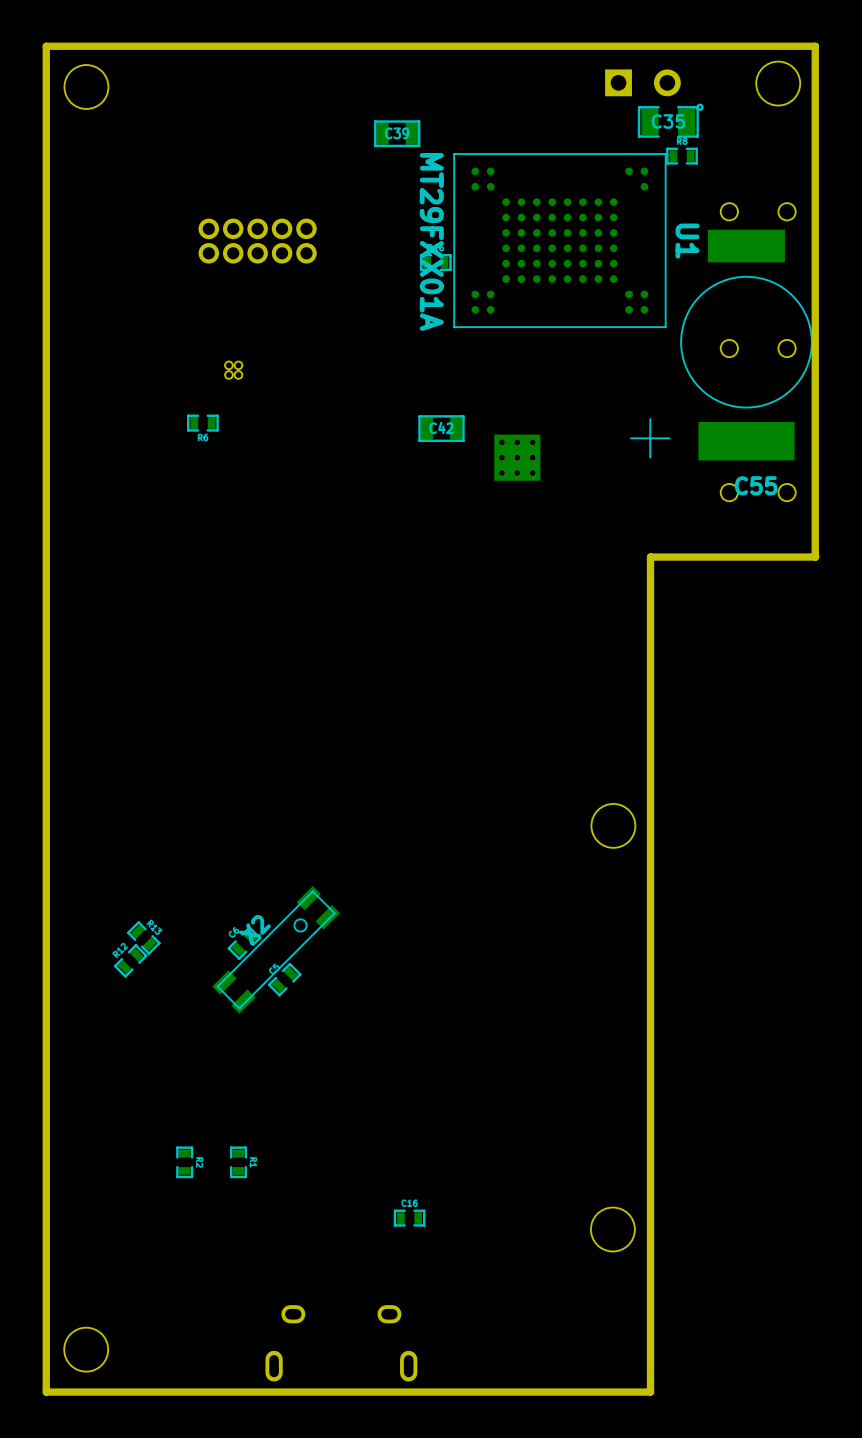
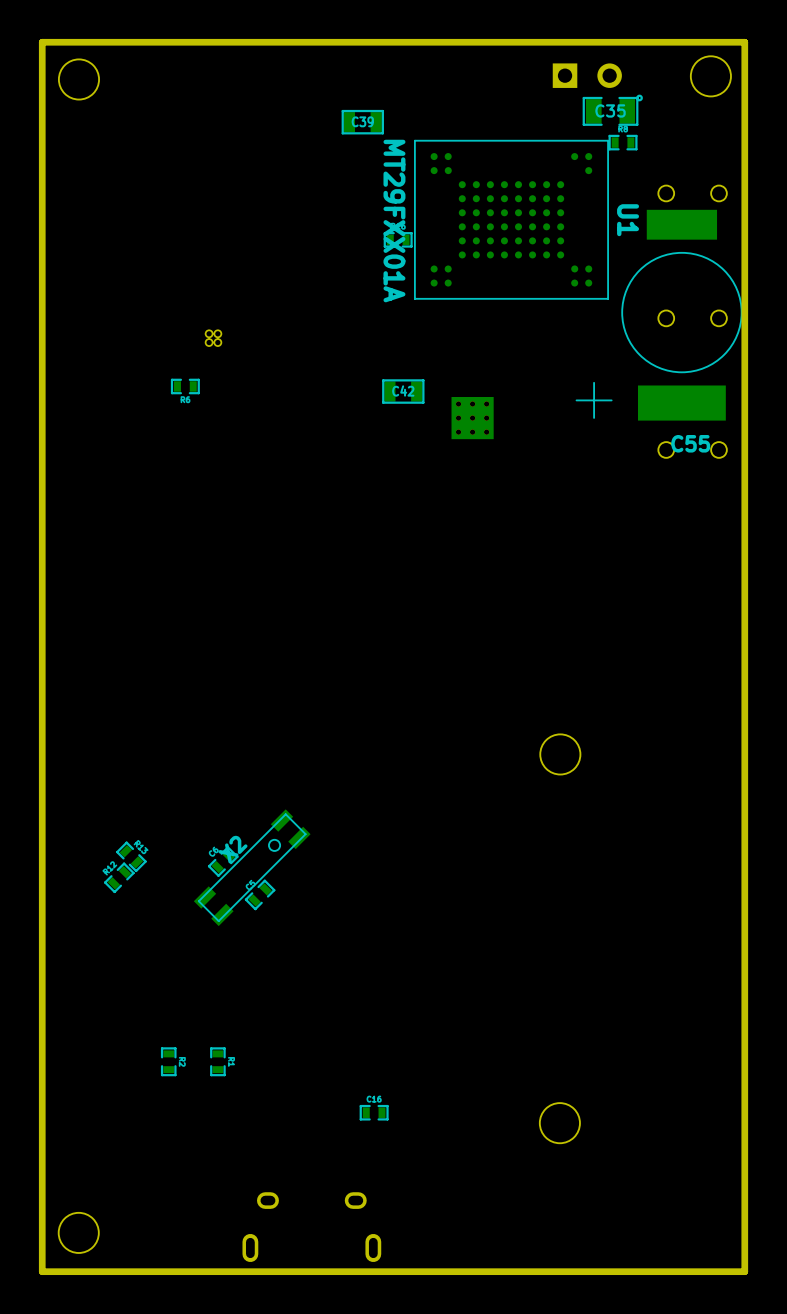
part: (257, 241) -> none
board edge: (815, 554) (815, 557) (650, 557) (650, 1391) -> (744, 507) (744, 1271) (594, 1271)

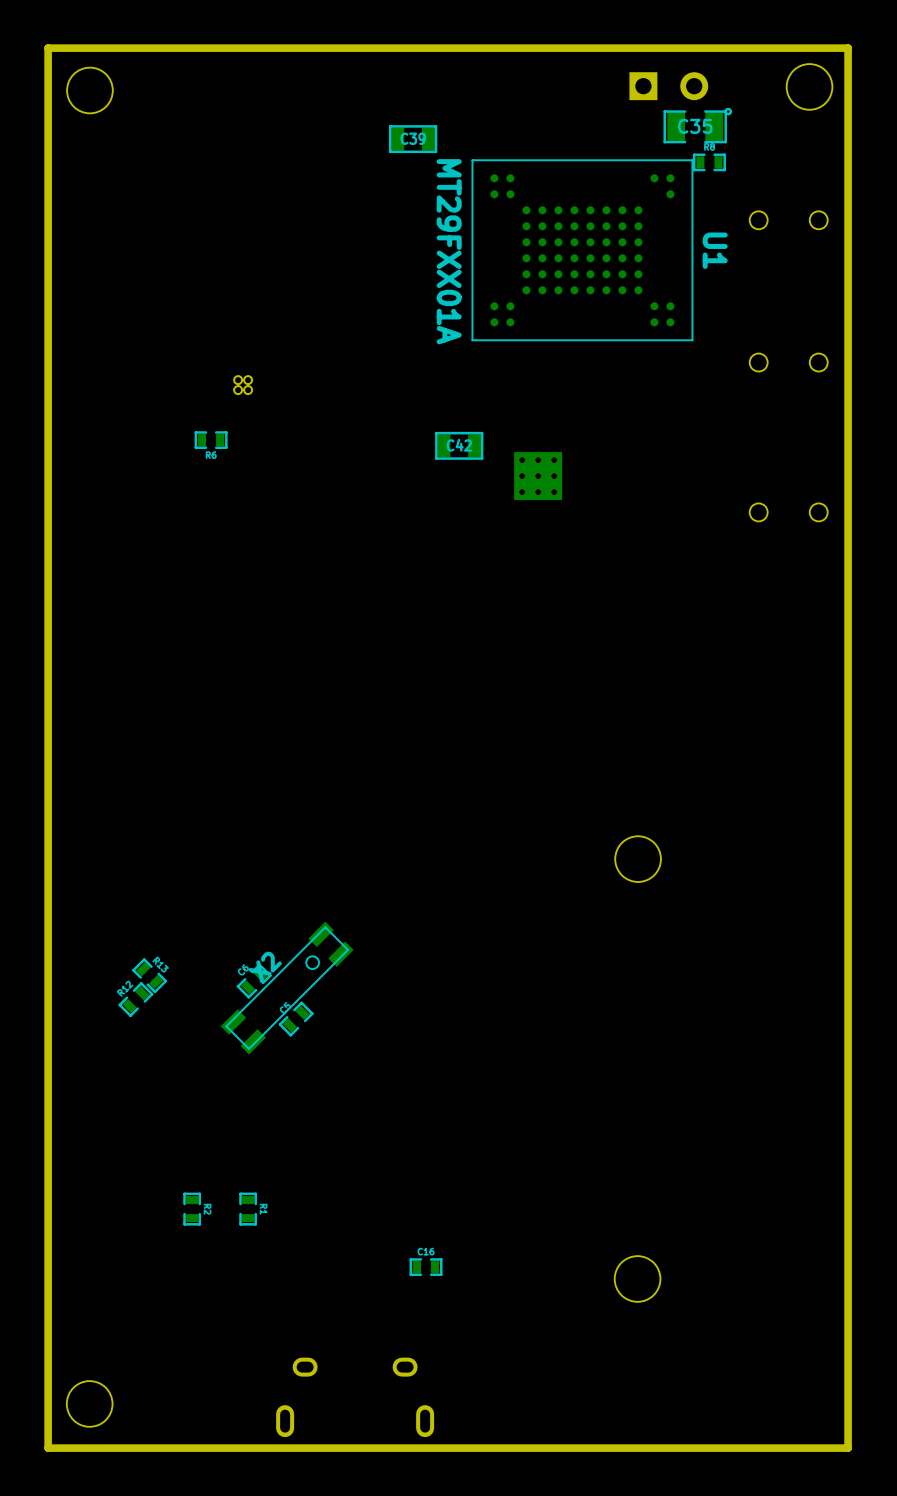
part: (398, 239) -> none
C55: (659, 315) -> none

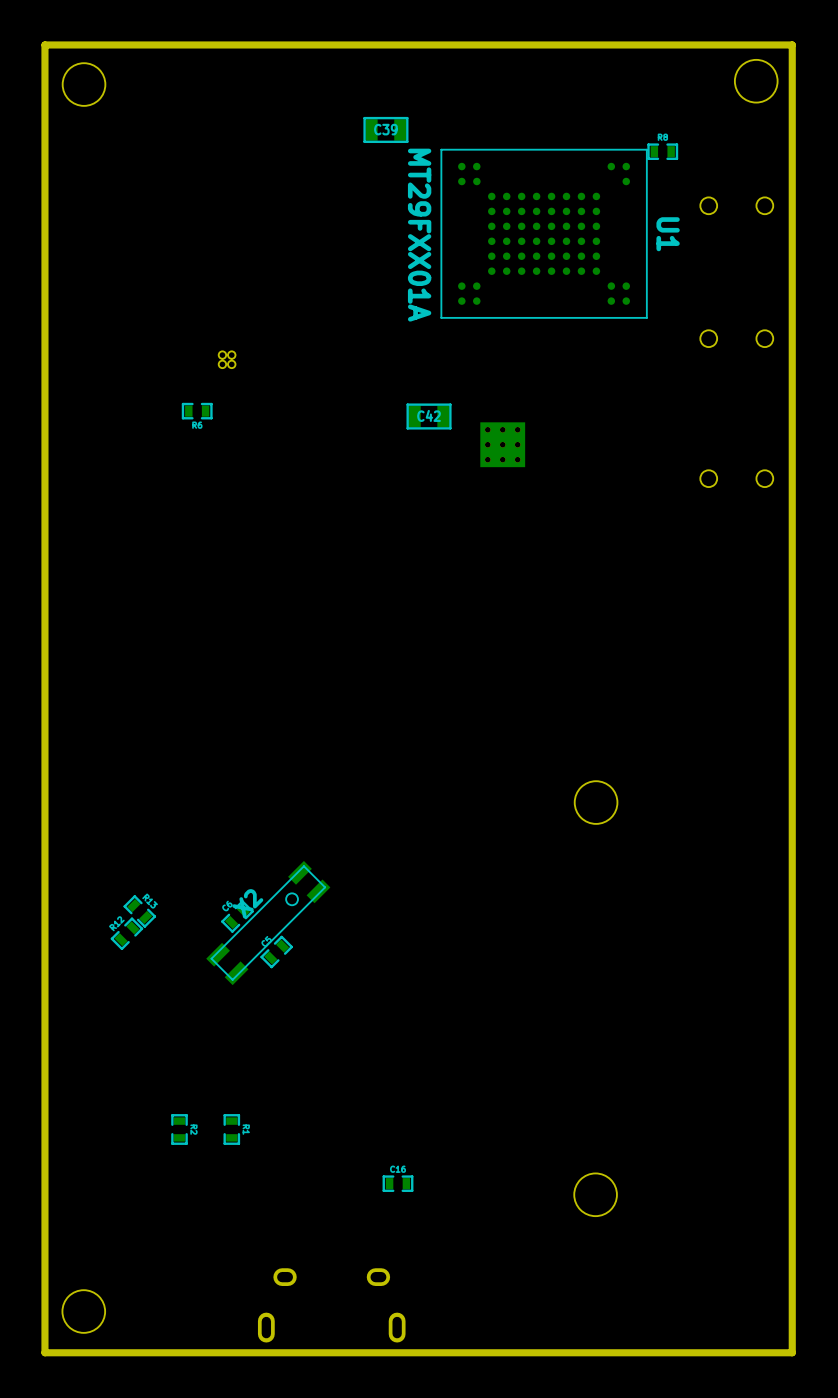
part: (668, 86) -> none
C35: (697, 125) -> none

